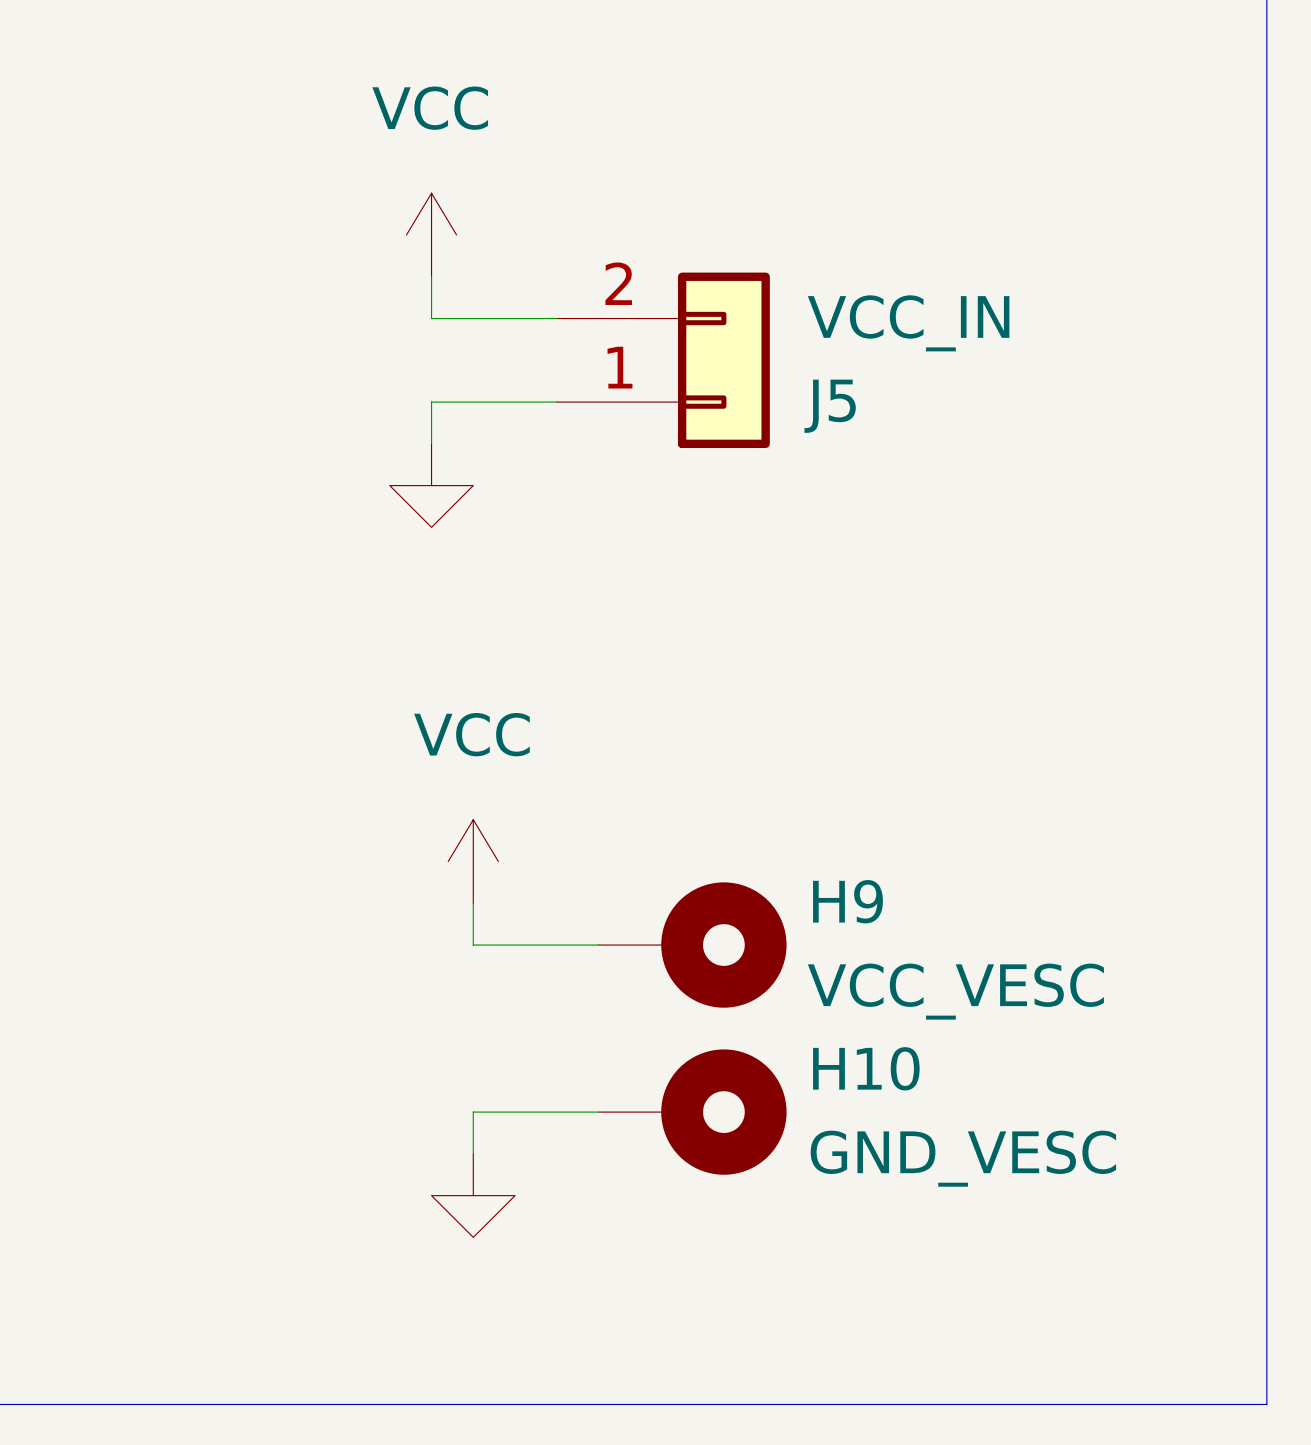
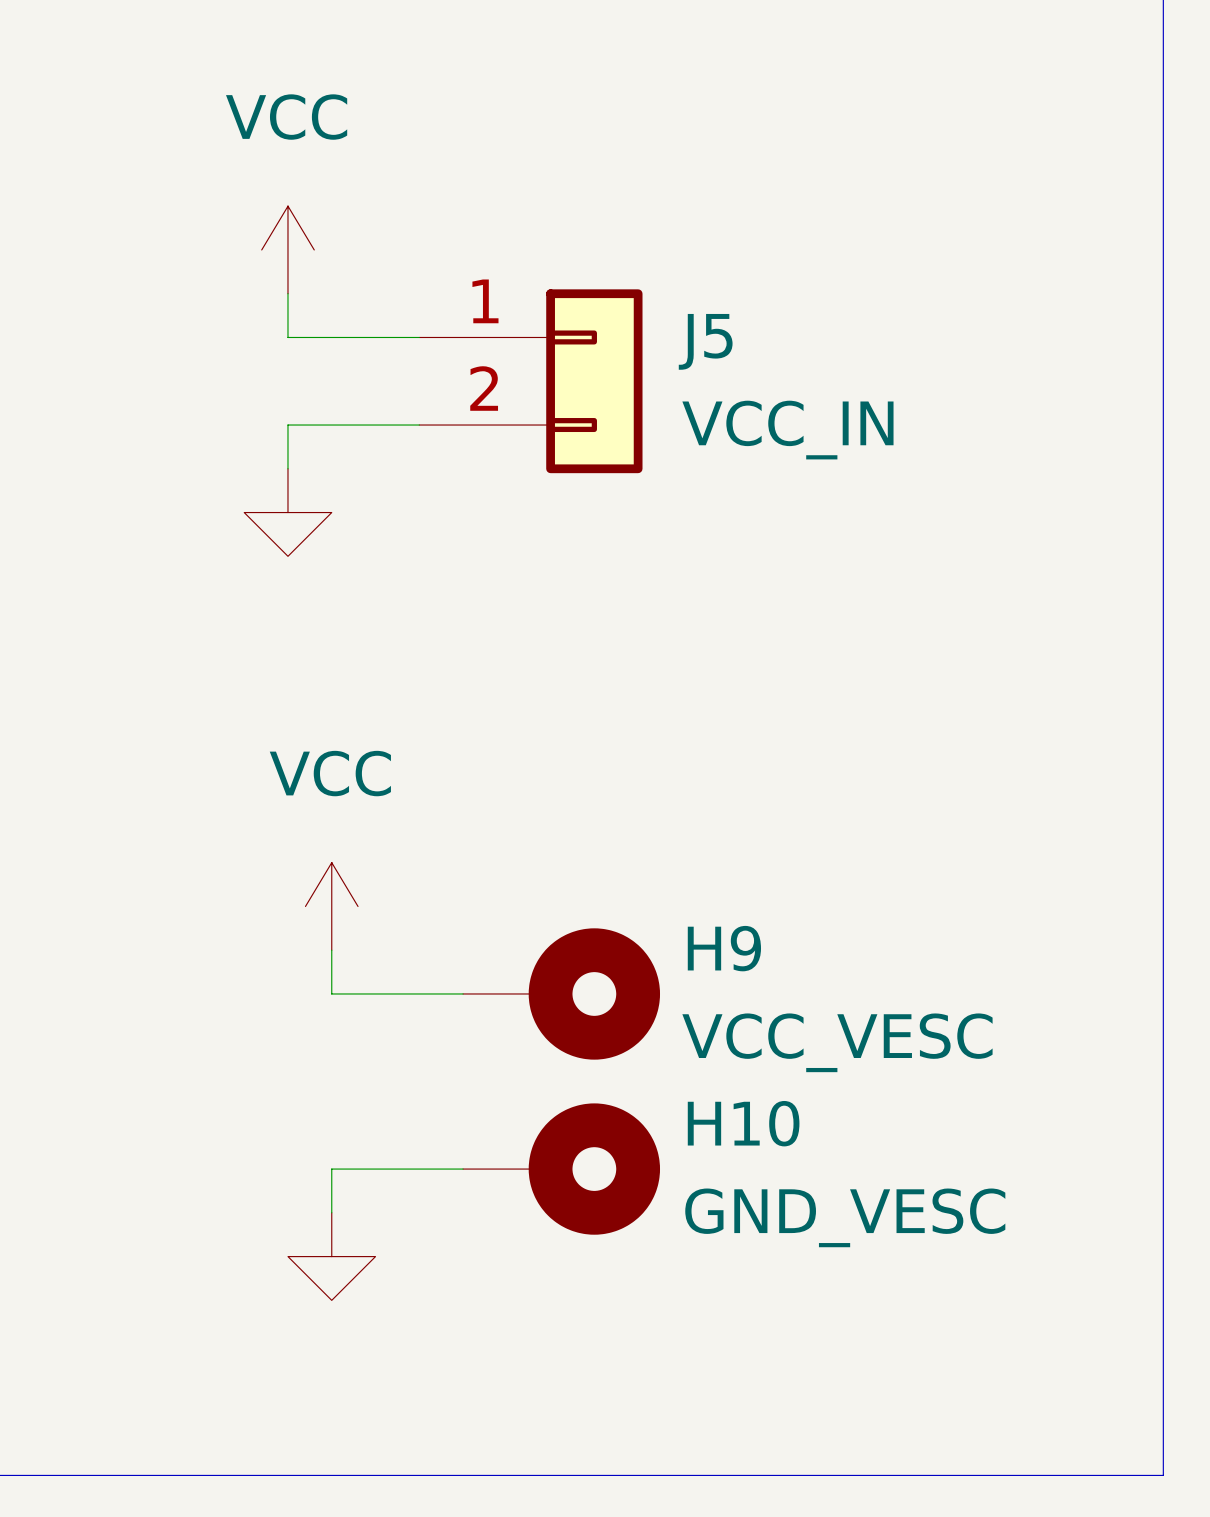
J5 flip: as is (723, 360) -> up-down (594, 381)

